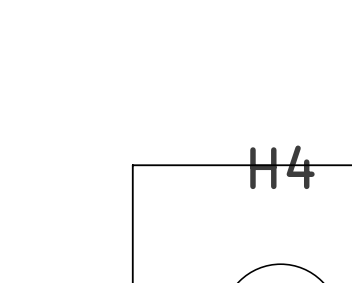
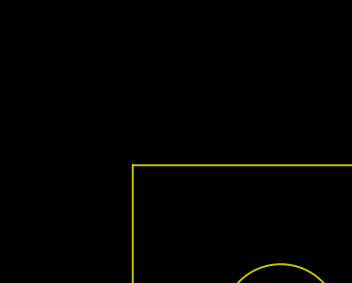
H4 name: H4 (282, 167) -> none

